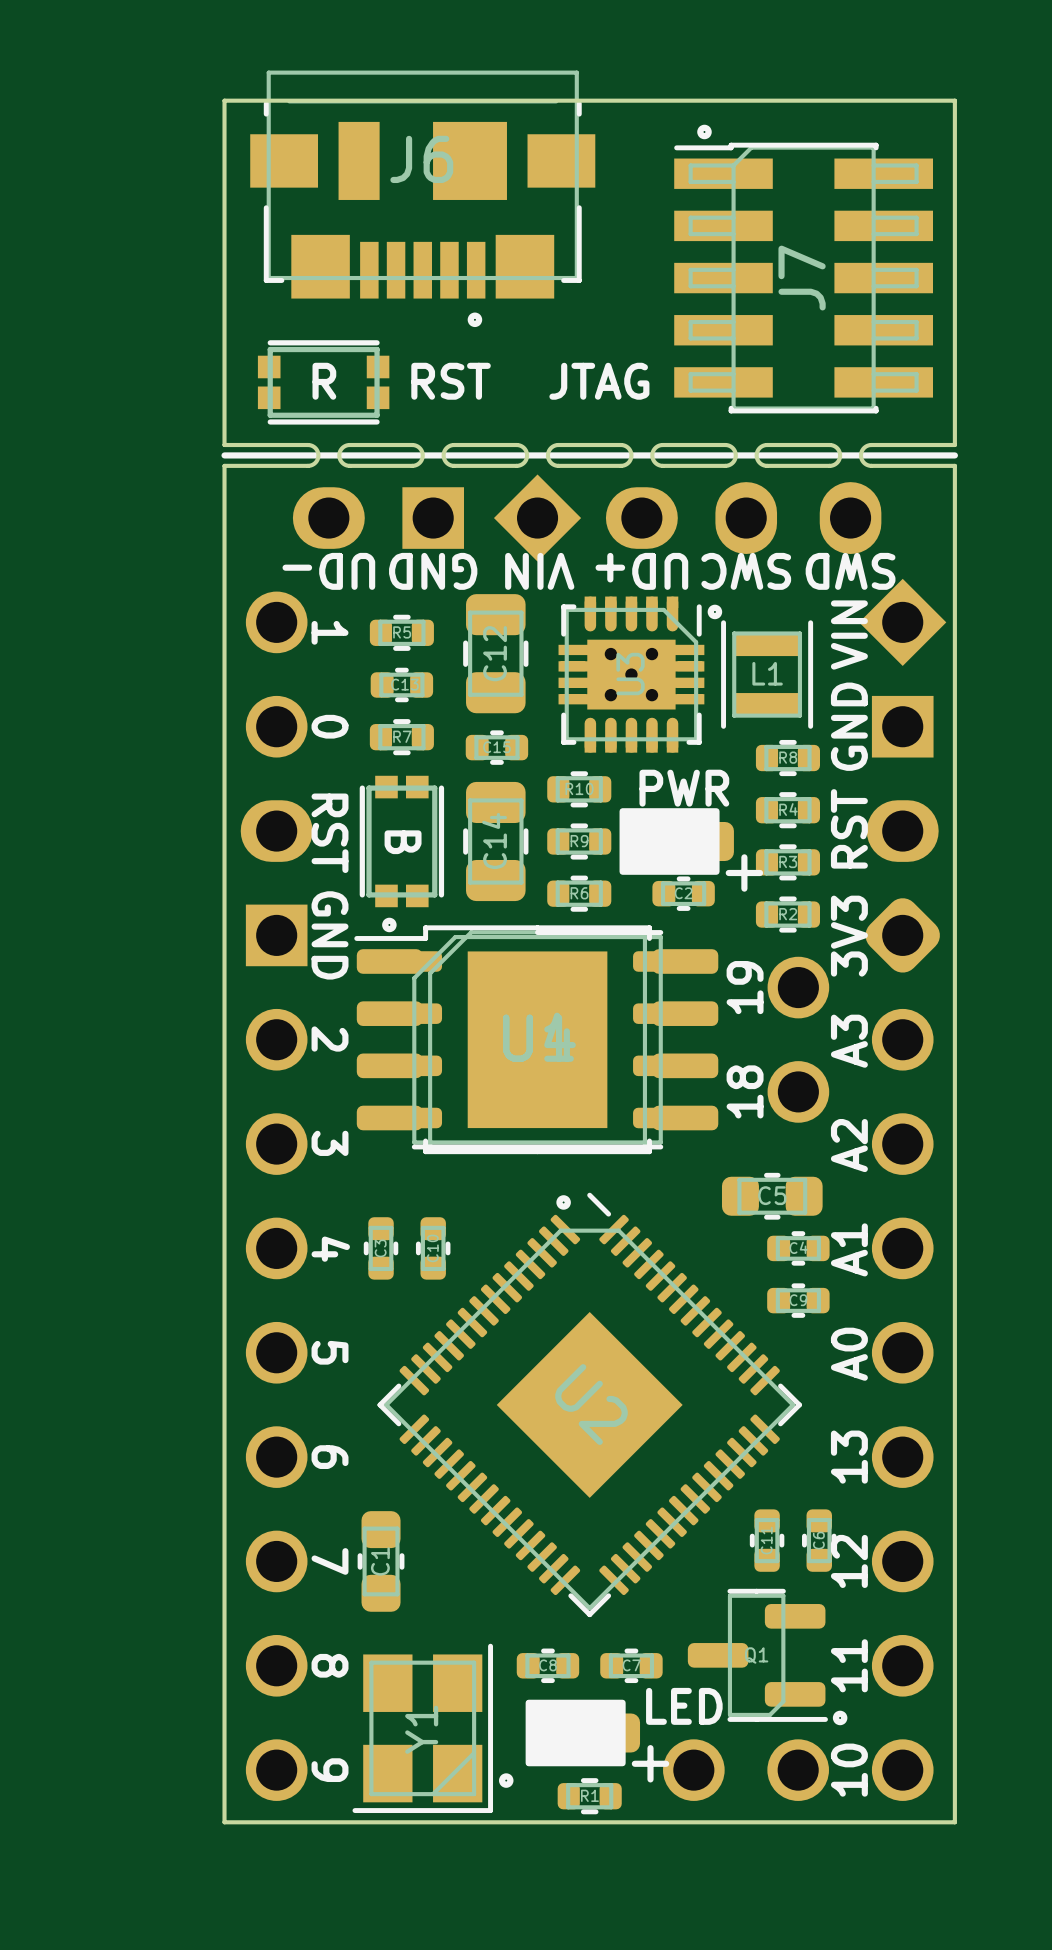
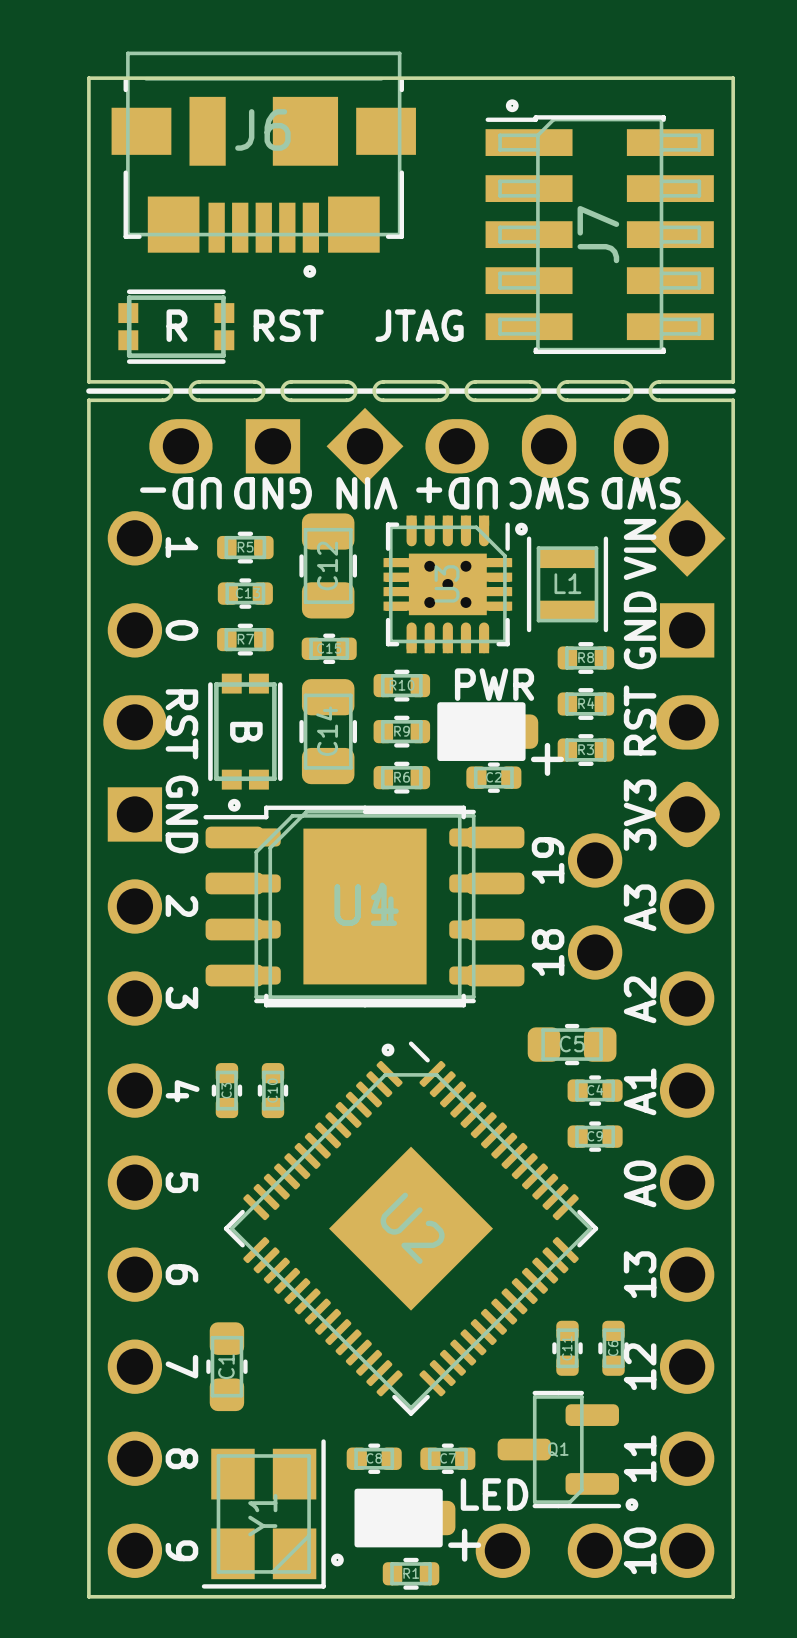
R2: (787, 914) -> none

